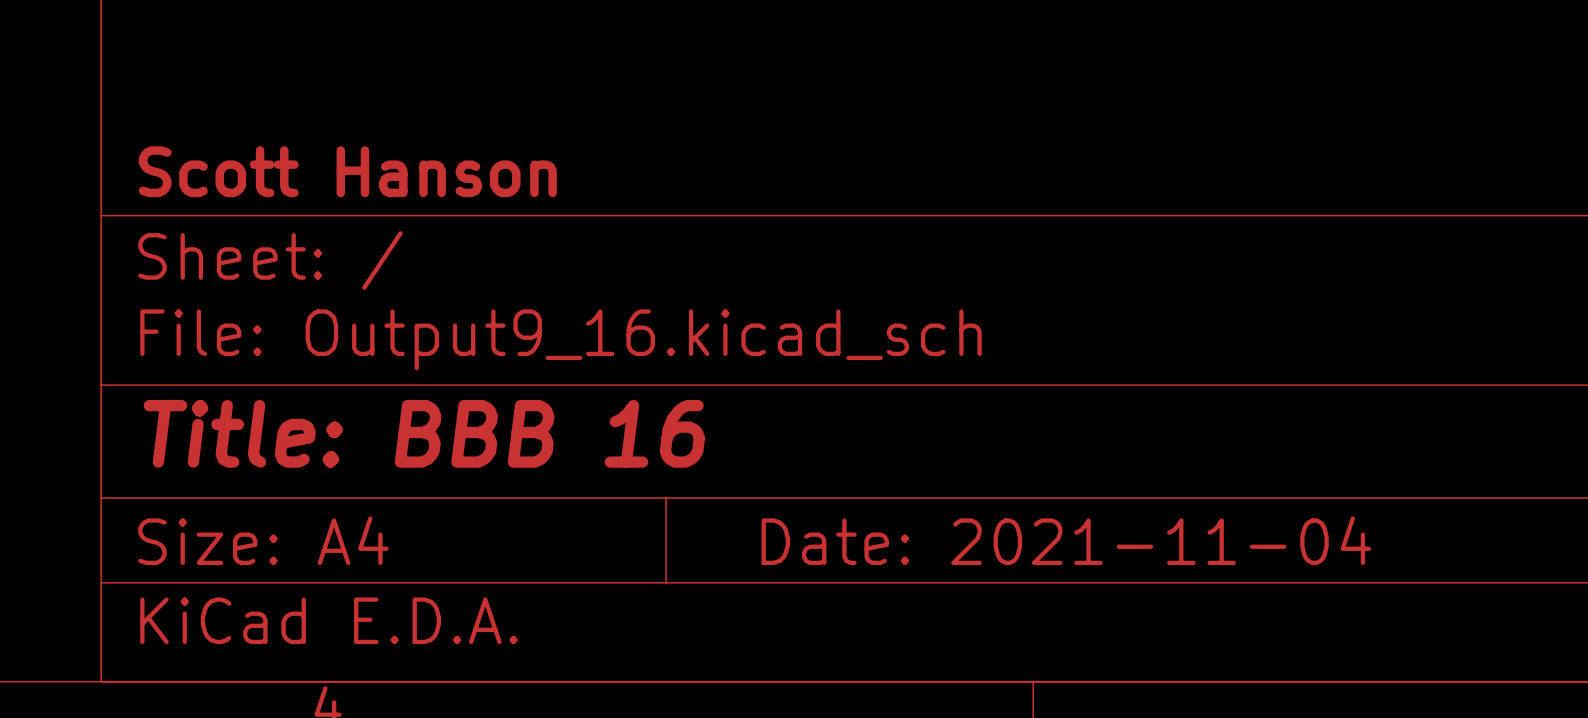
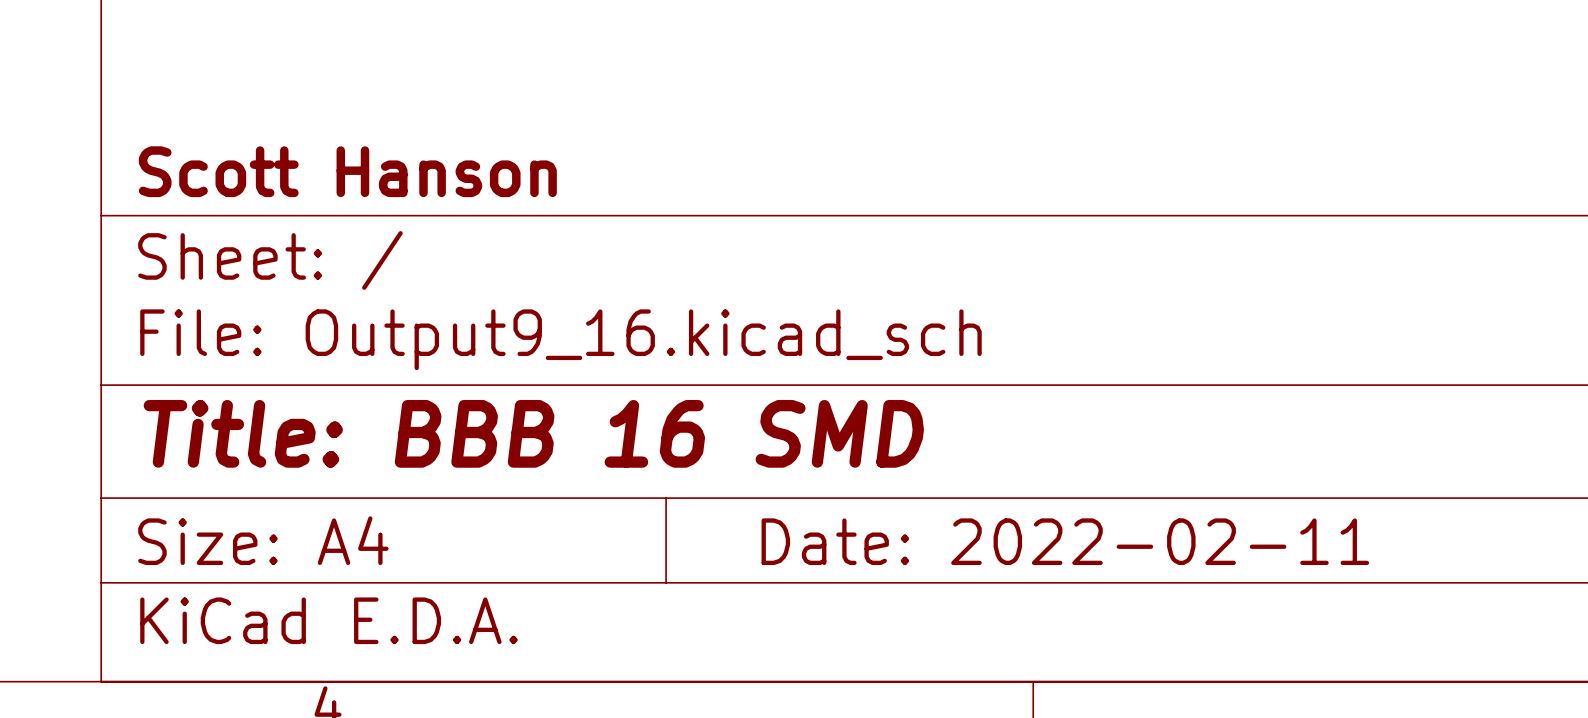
title block: Title: BBB 16 (424, 433) -> Title: BBB 16 SMD (533, 433)
title block: Date: 2021-11-04 (1066, 540) -> Date: 2022-02-11 (1065, 541)

